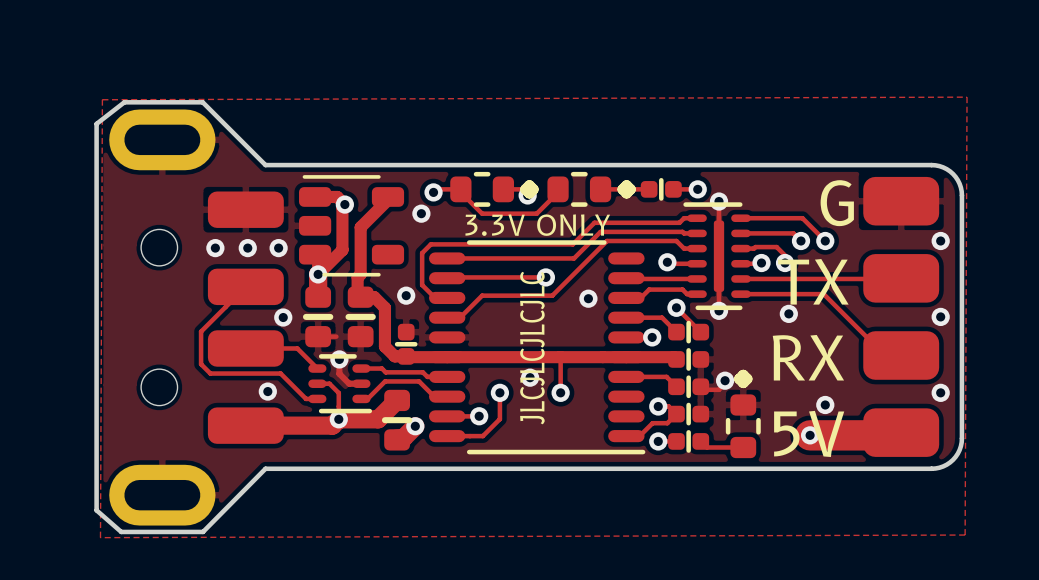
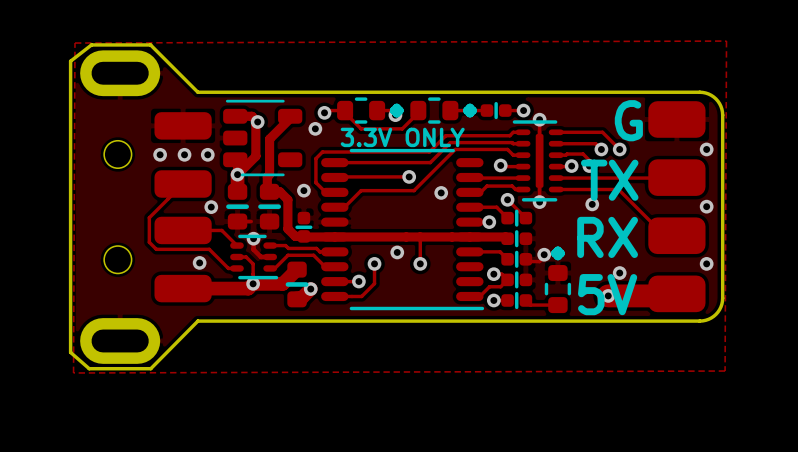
text: JLCJLCJLCJLC (532, 348) -> none

